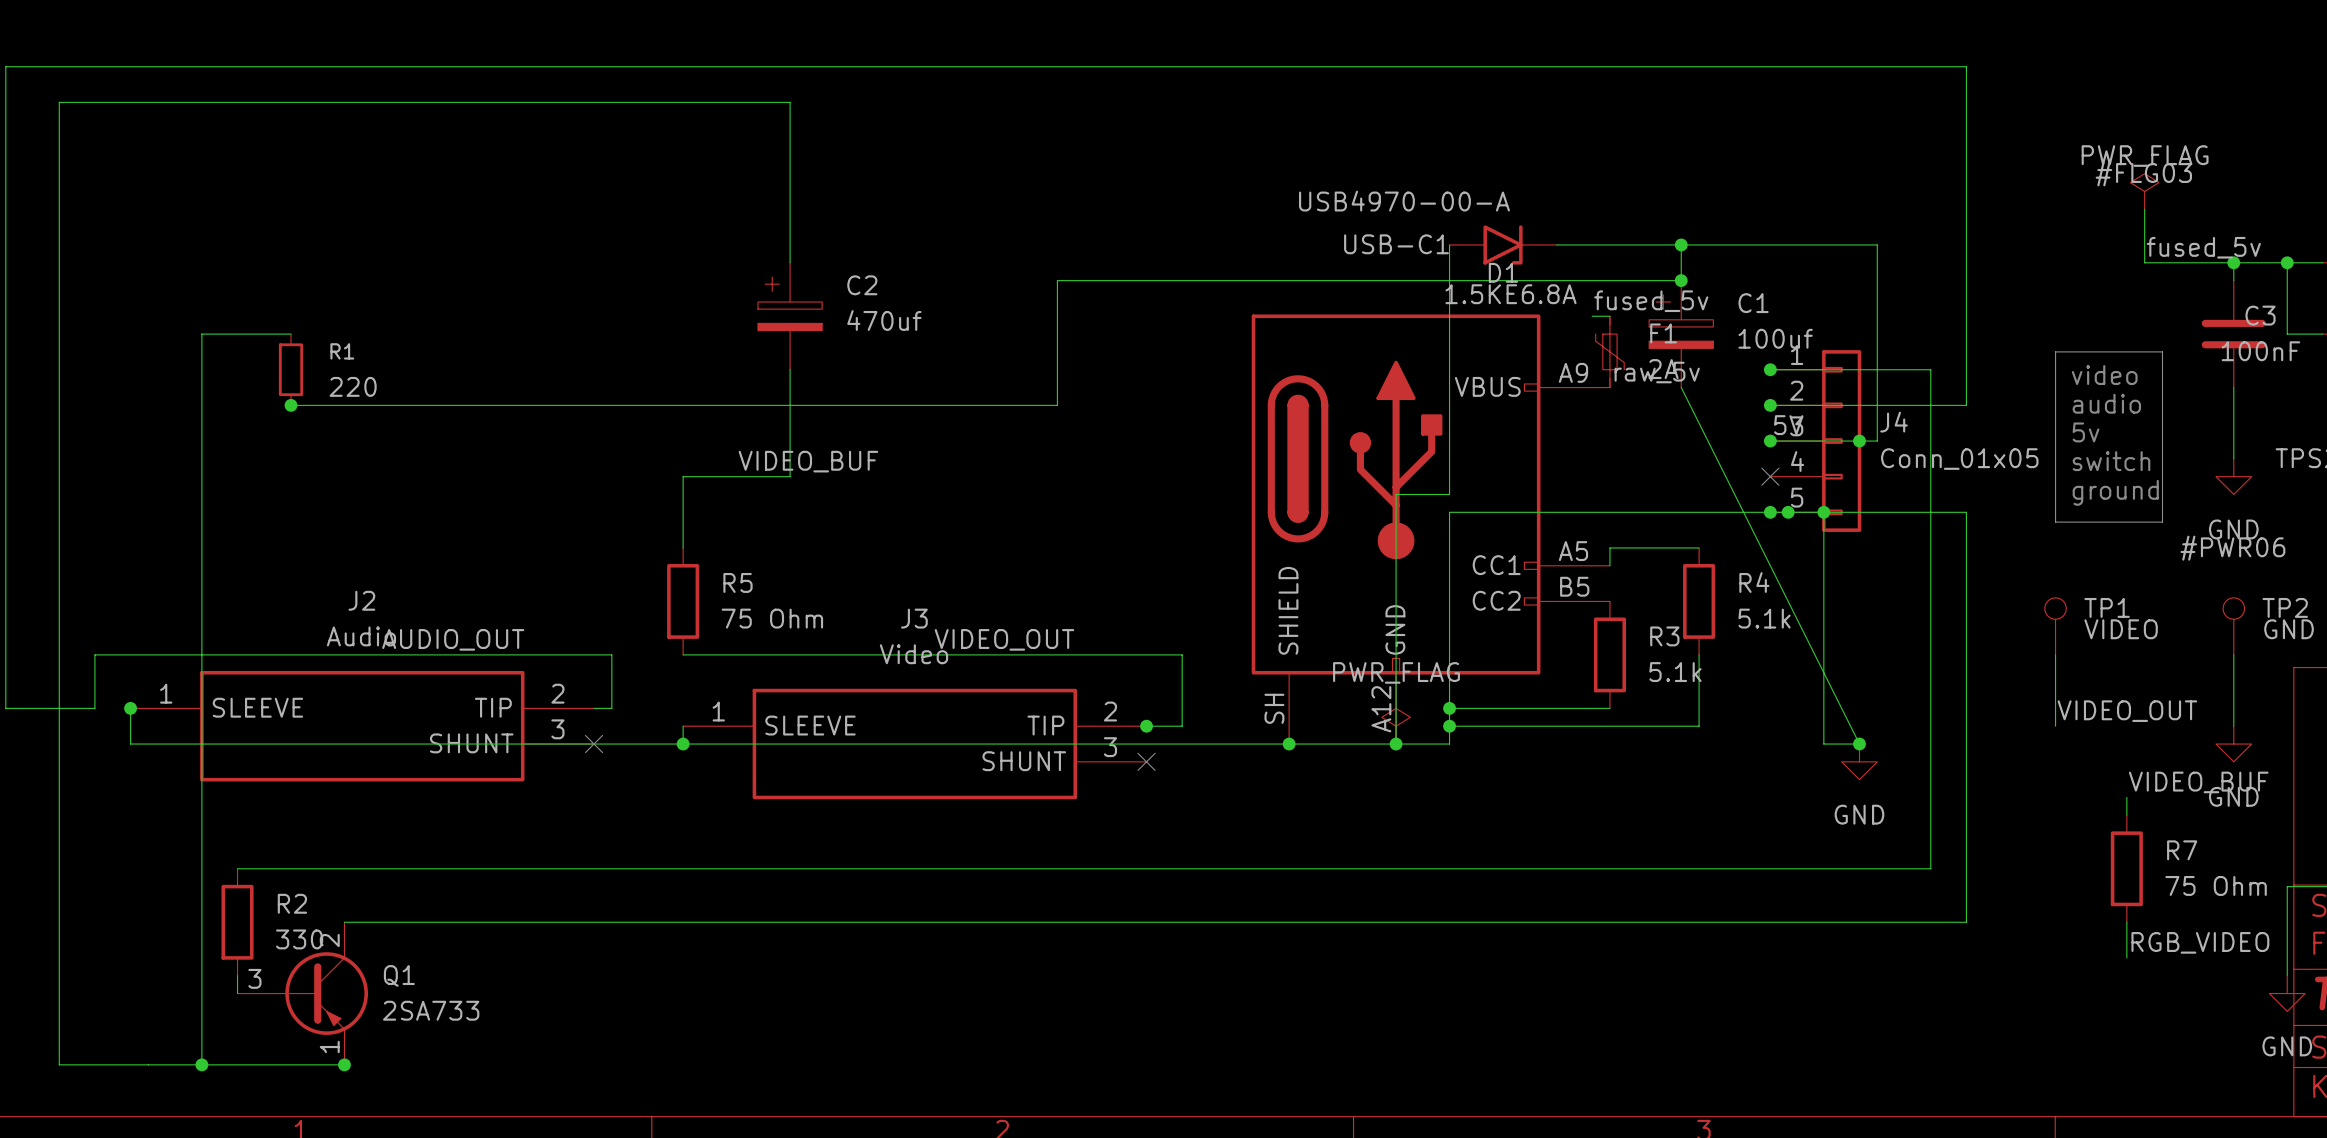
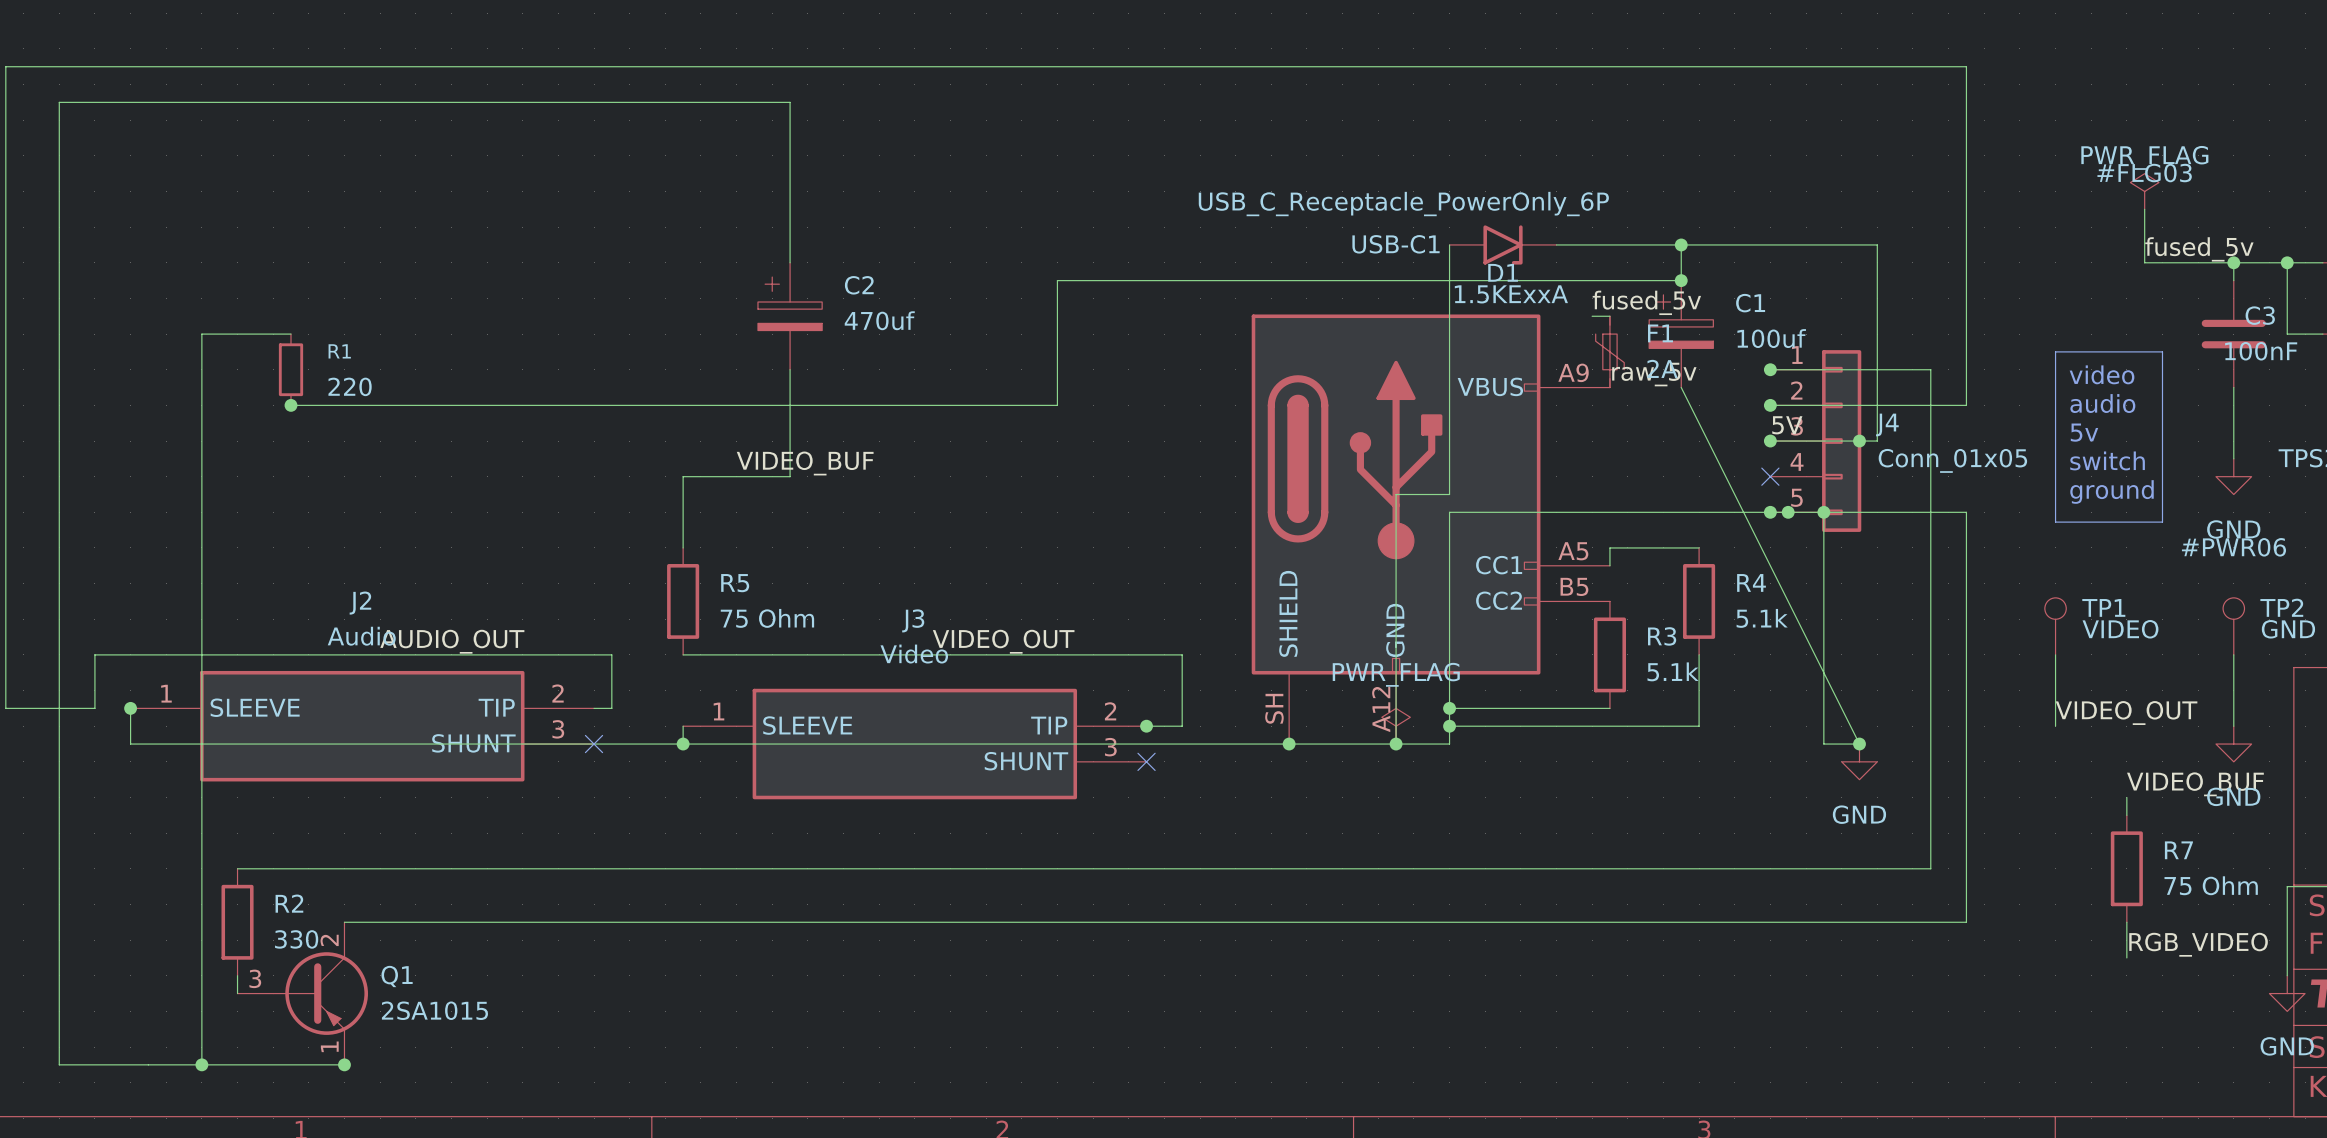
USB-C1 value: USB4970-00-A (1404, 201) -> USB_C_Receptacle_PowerOnly_6P (1403, 204)
D1 value: 1.5KE6.8A (1510, 294) -> 1.5KExxA (1511, 294)
Q1 value: 2SA733 (431, 1010) -> 2SA1015 (434, 1010)

